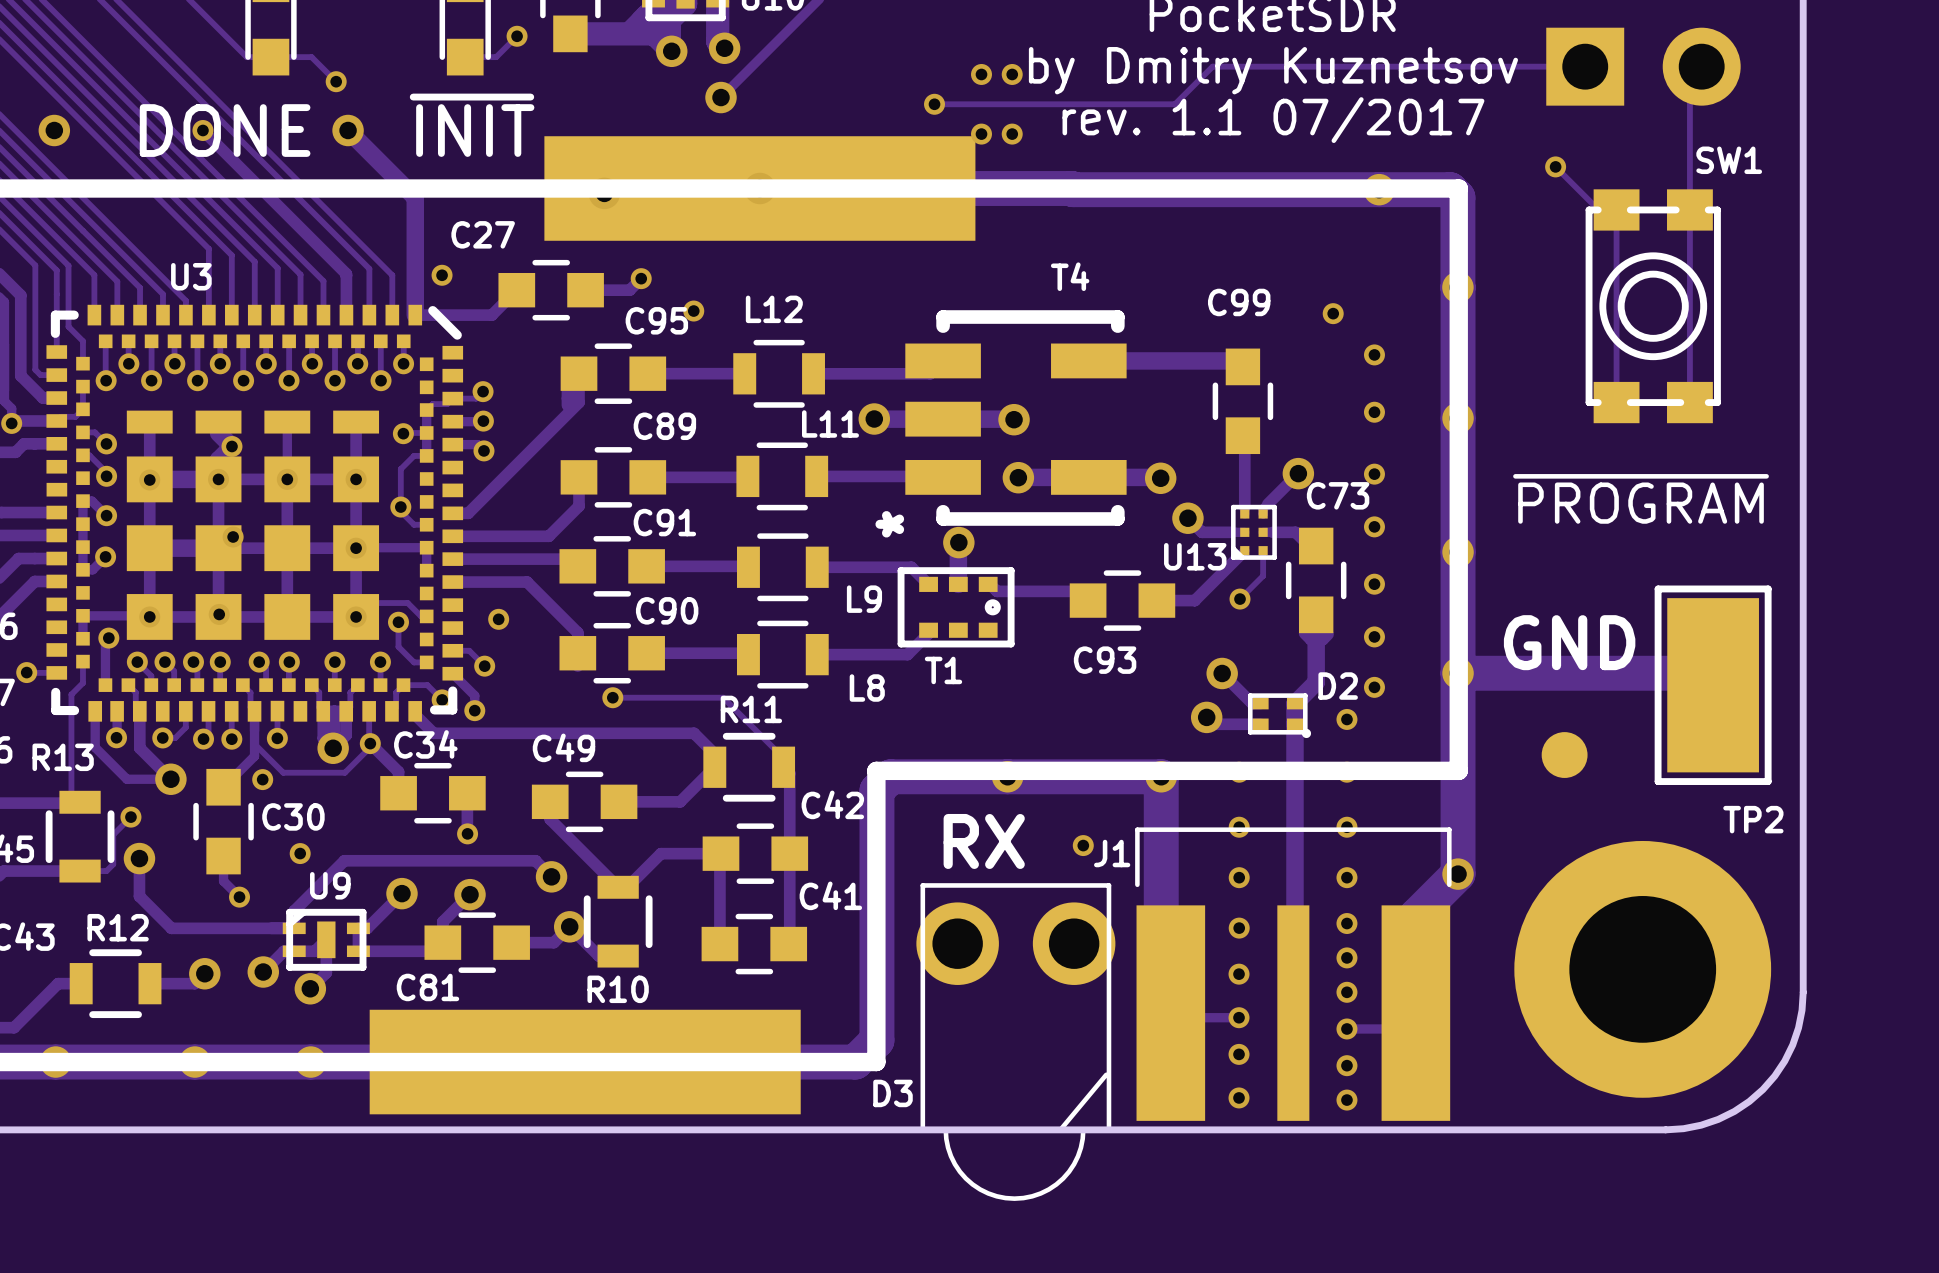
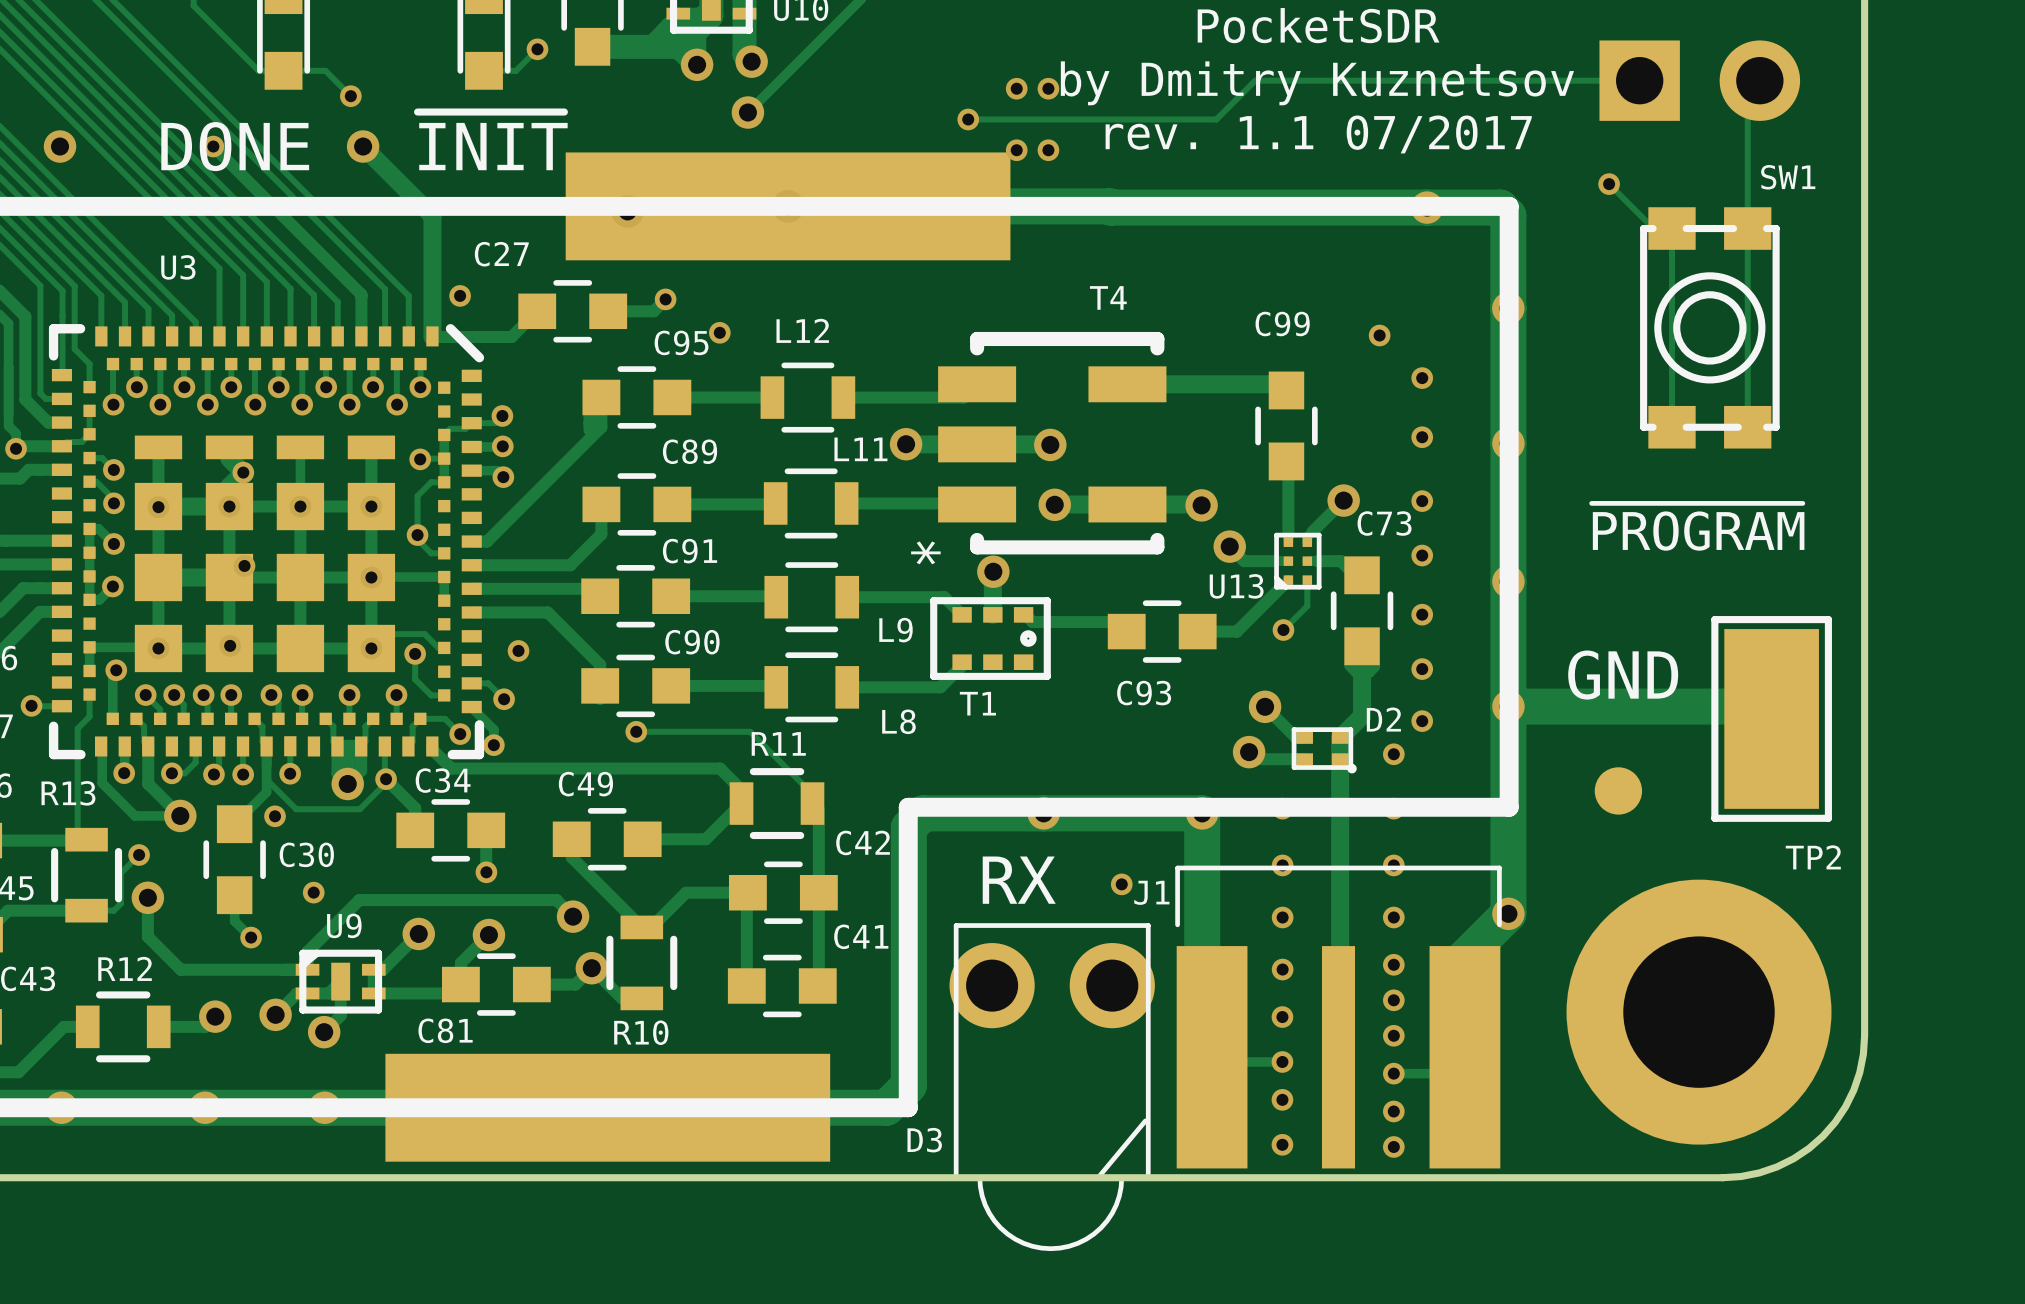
U3 name position: U3 (191, 276) -> U3 (178, 267)
U3 footprint: [46, 304, 464, 722] -> [48, 324, 485, 760]

